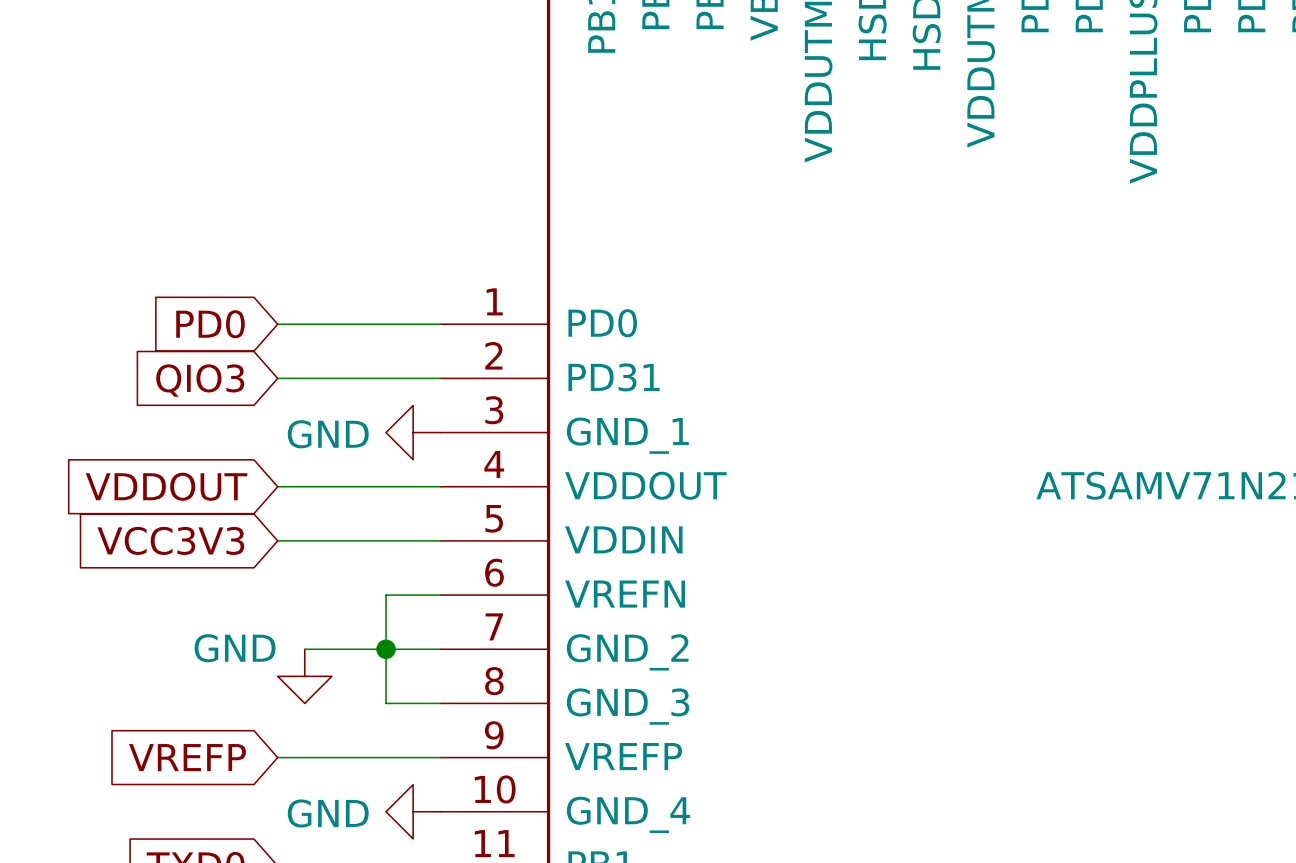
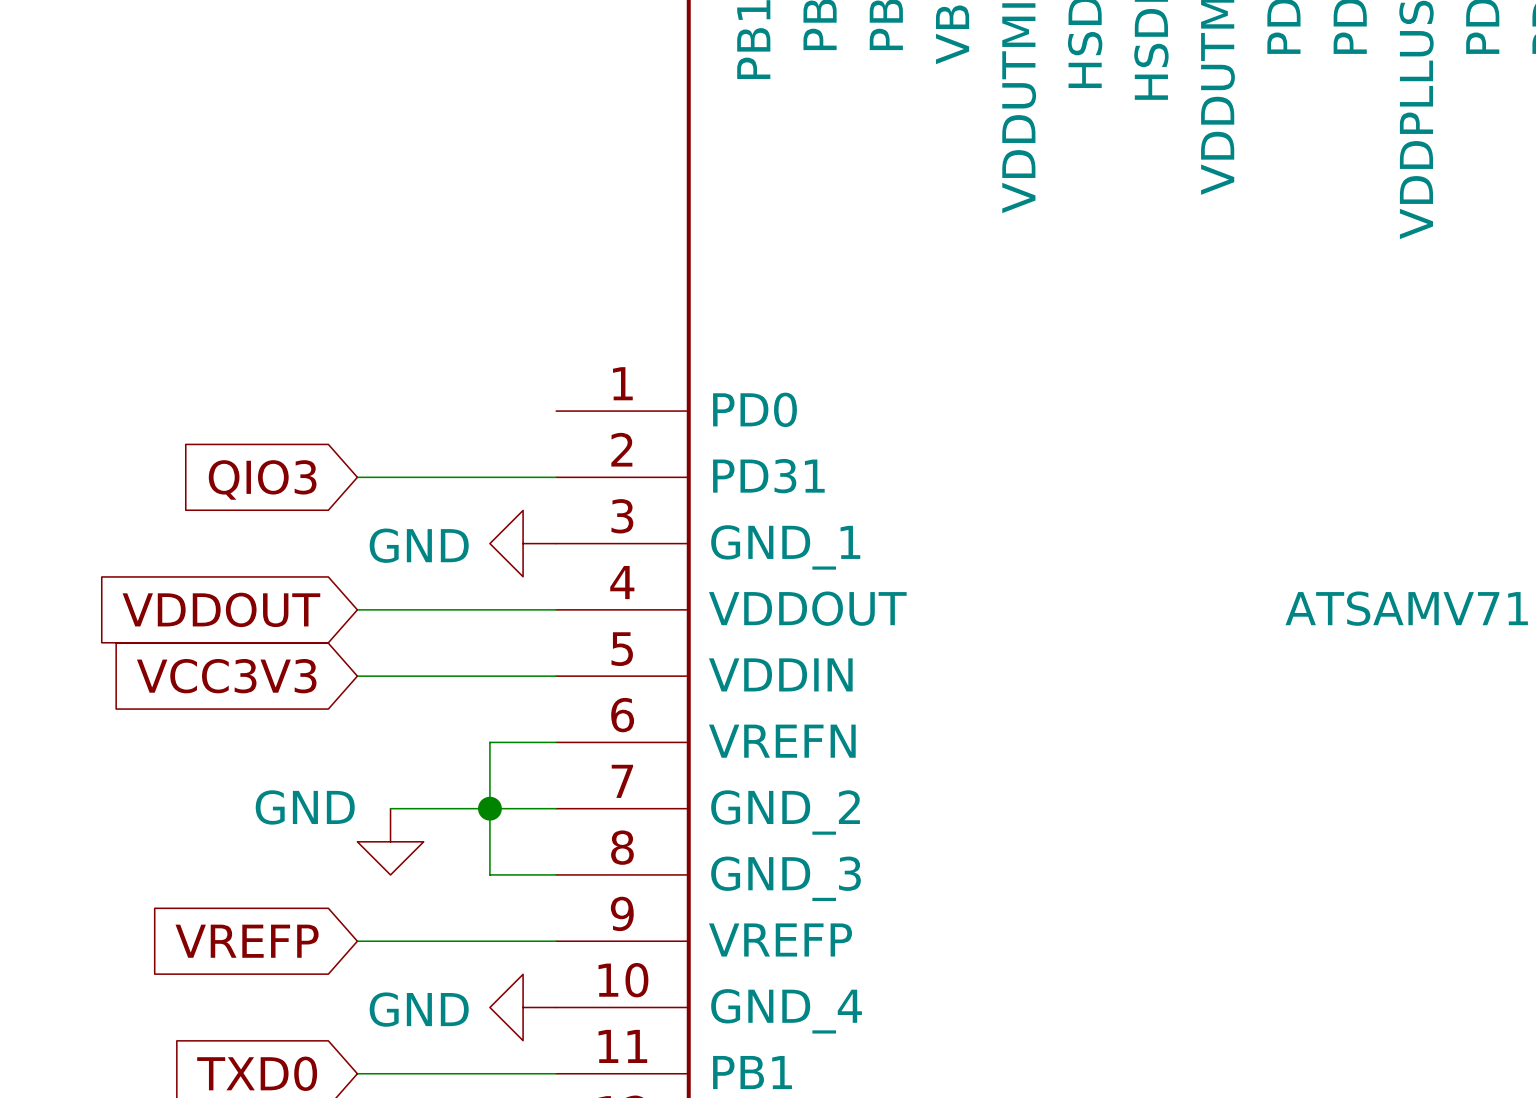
global label: PD0 (210, 324) -> none
wire: (277, 324) (440, 324) -> none

